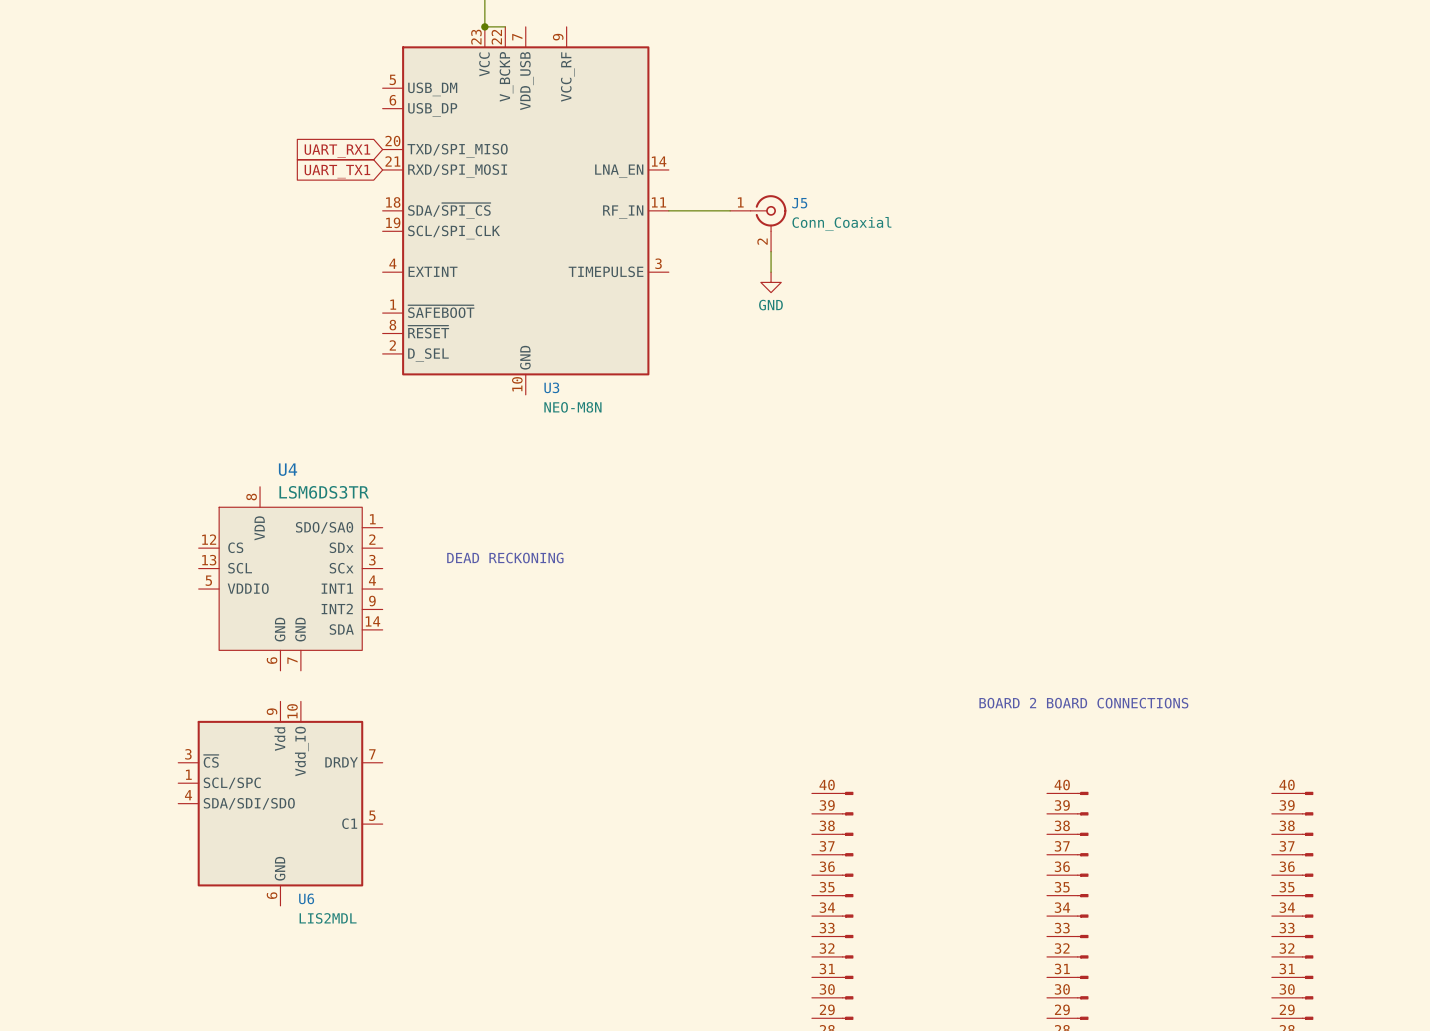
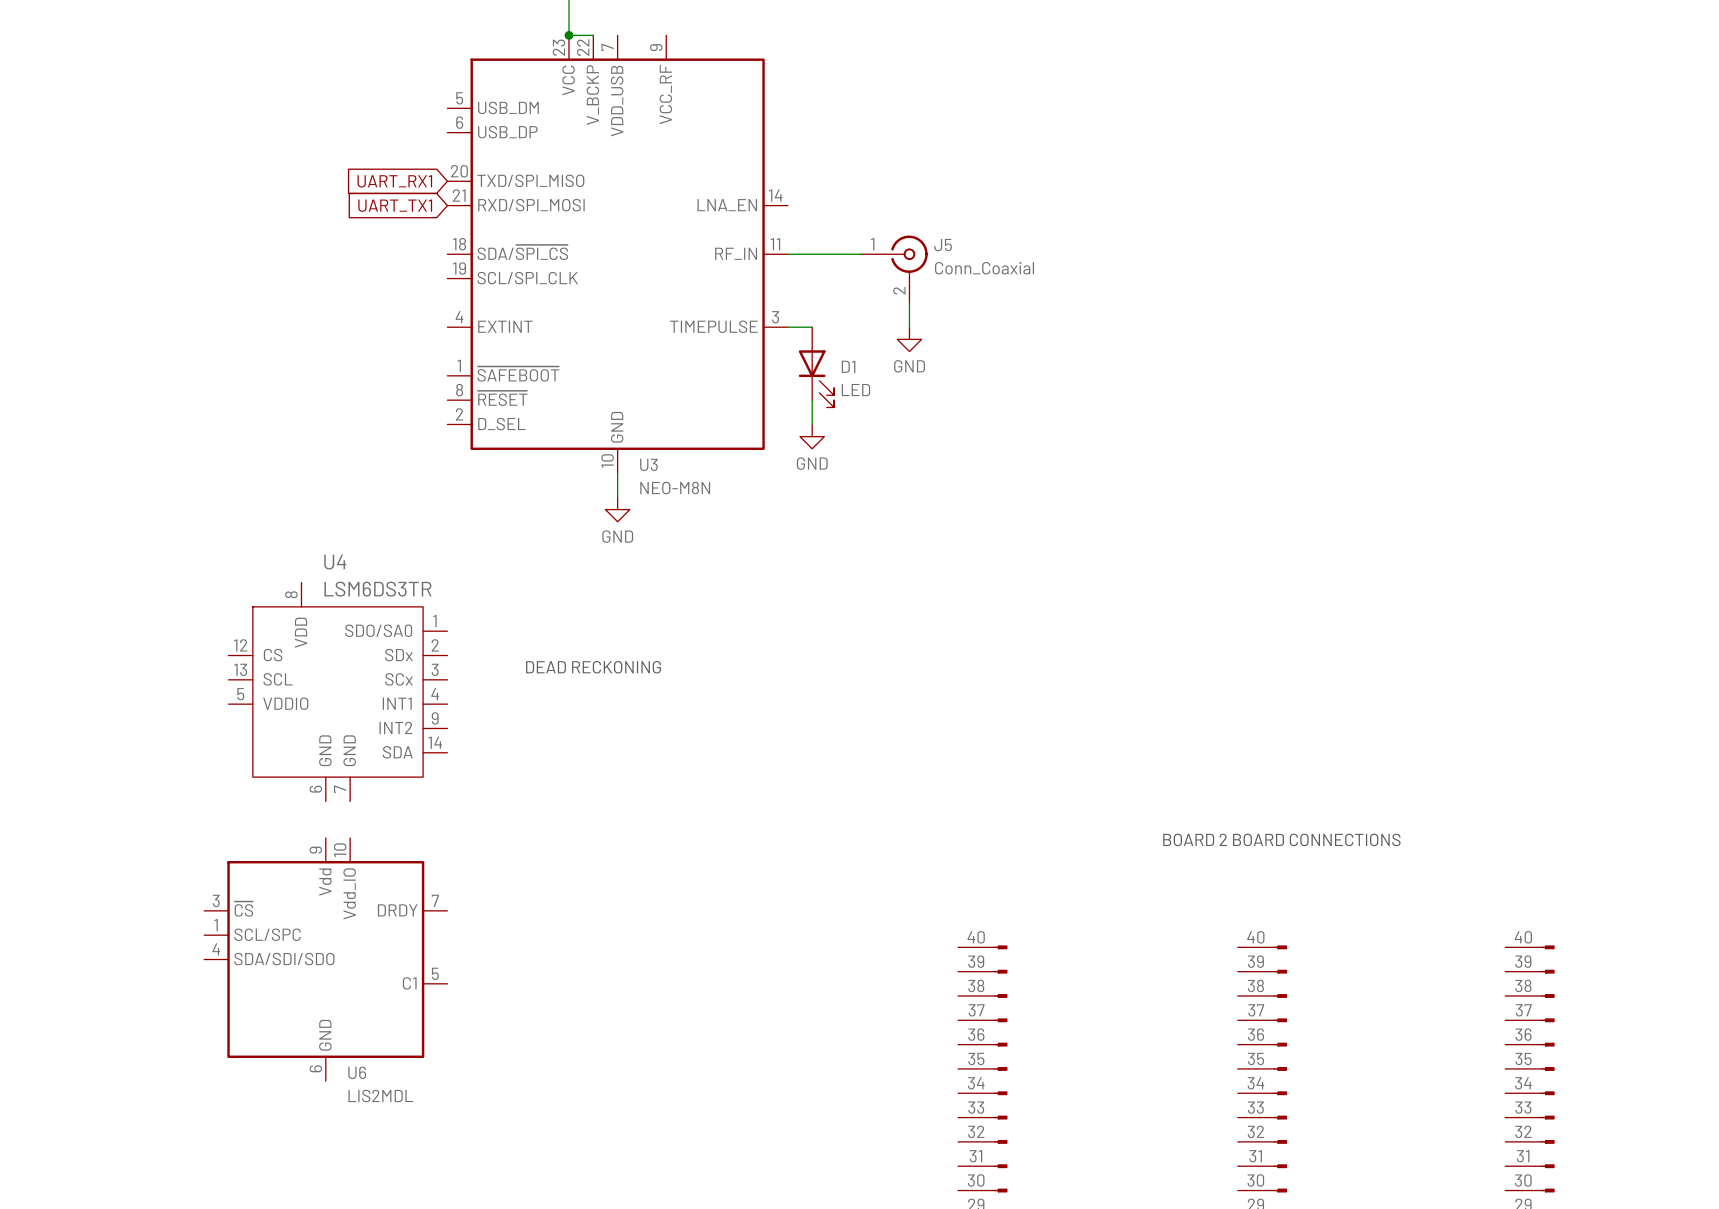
wire: none -> (787, 327) (812, 327)
D1: none -> LED (816, 367)
wire: none -> (812, 400) (812, 424)
power symbol: none -> GND (812, 436)
wire: none -> (617, 473) (617, 497)
power symbol: none -> GND (617, 509)

